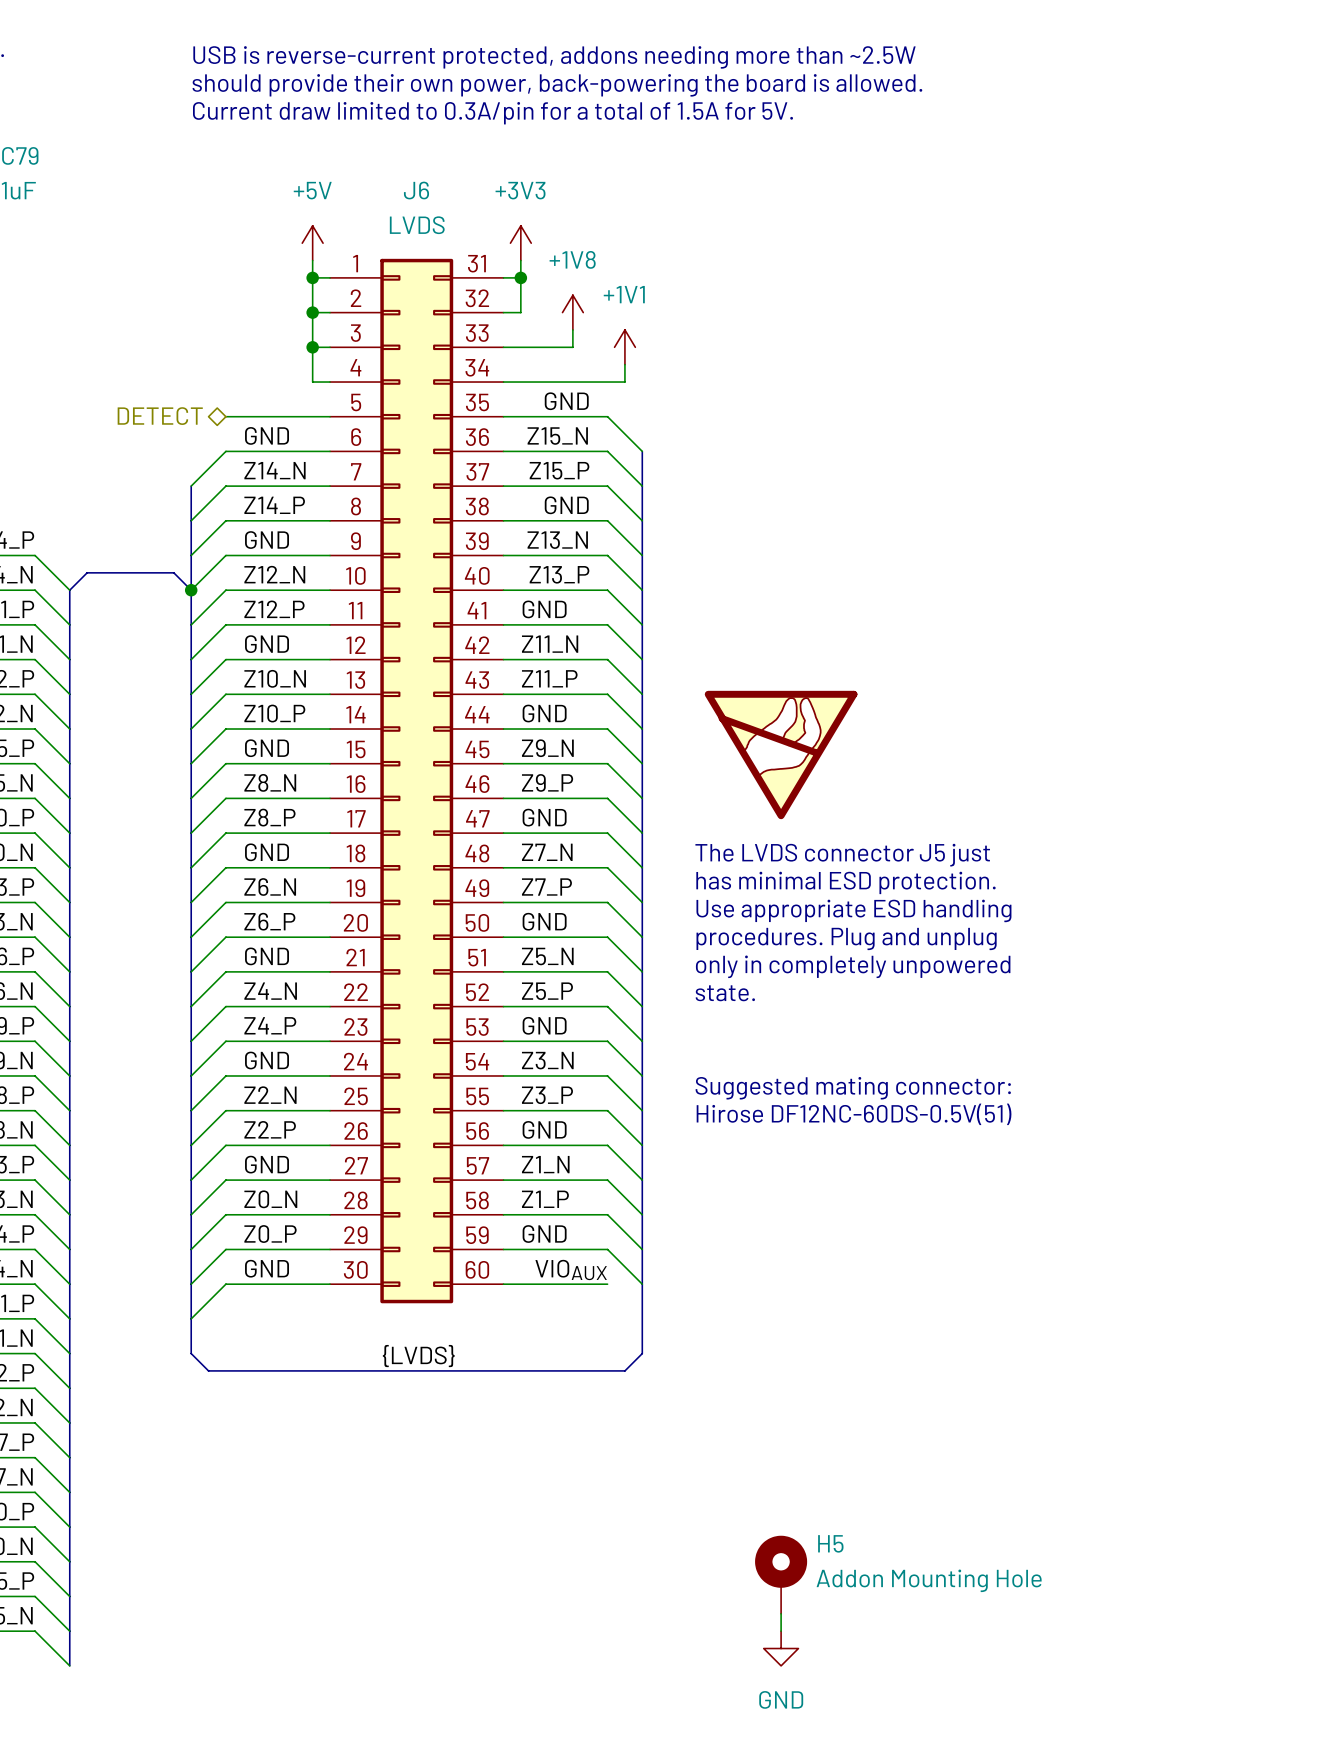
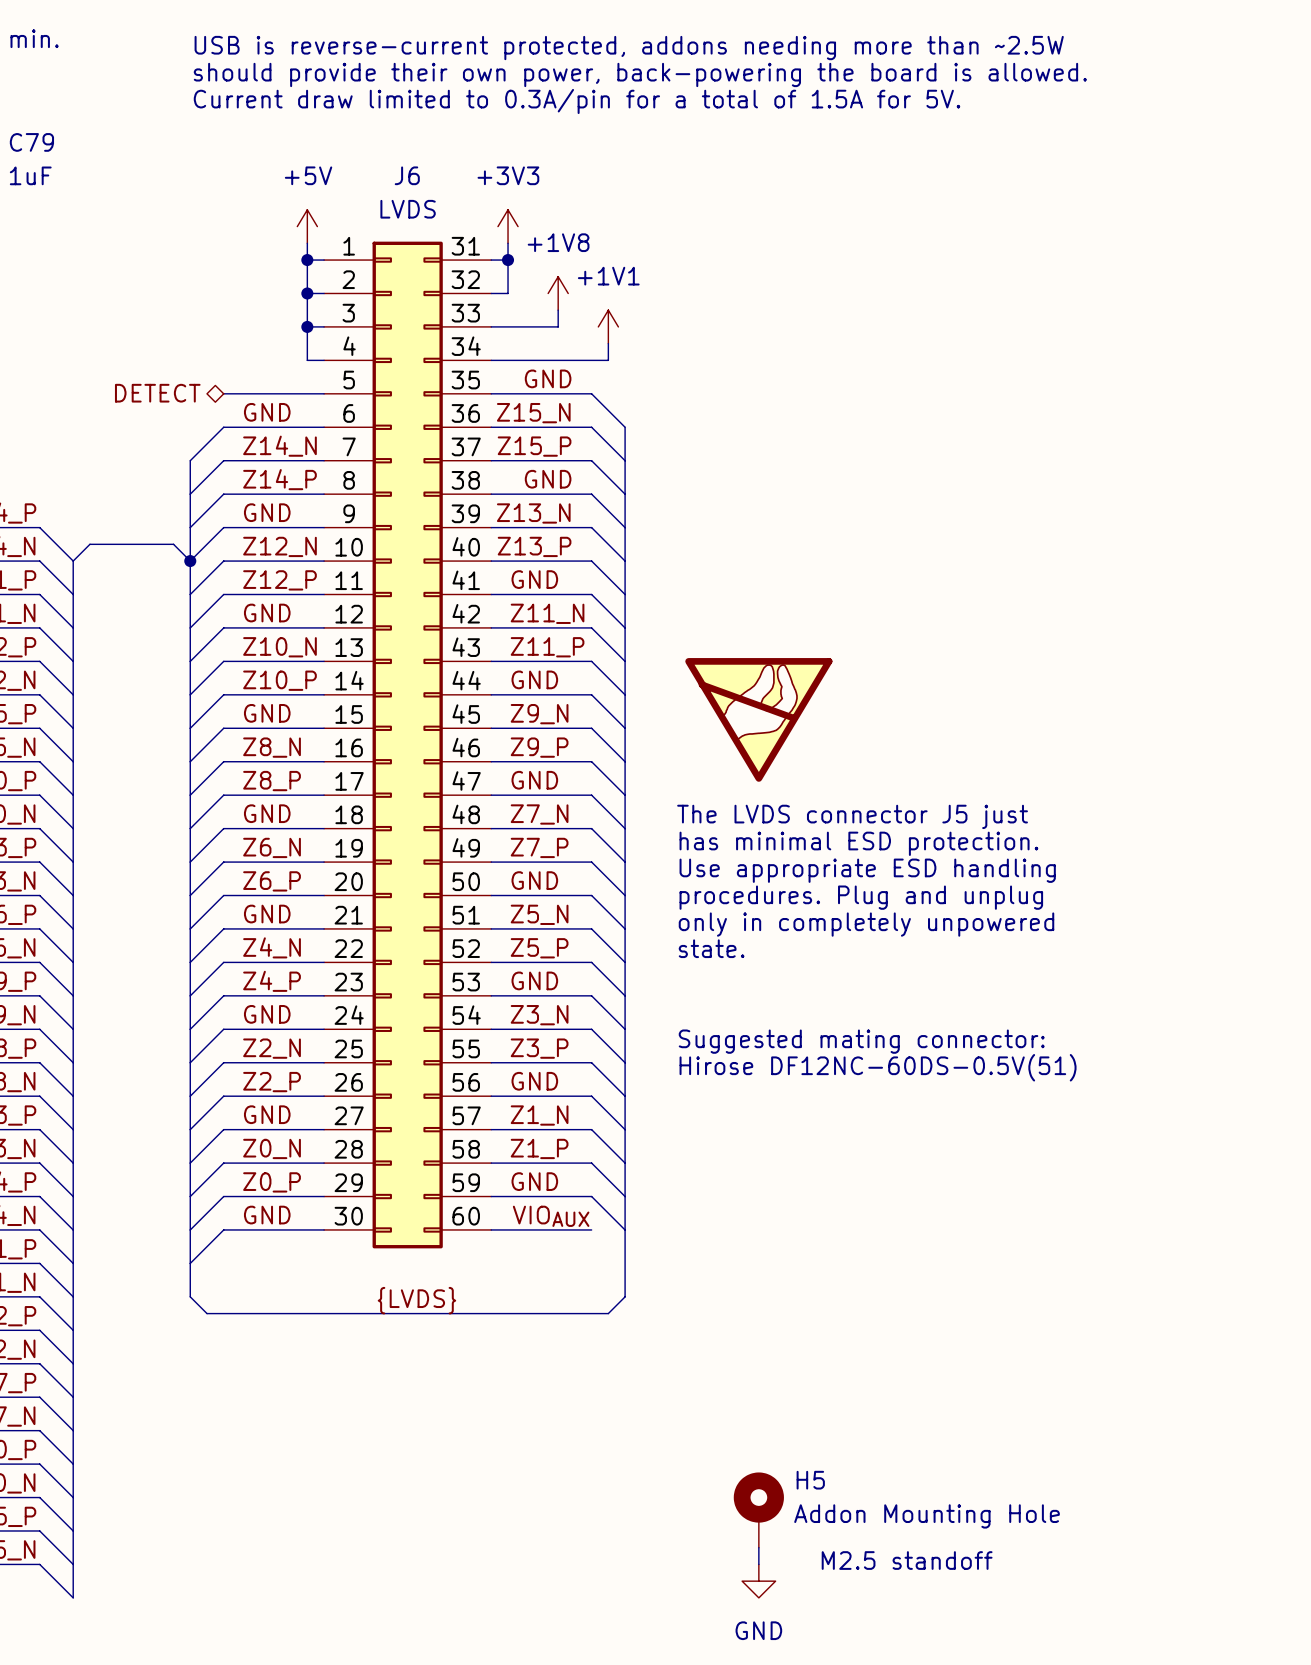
text: none -> M2.5 standoff (907, 1560)

